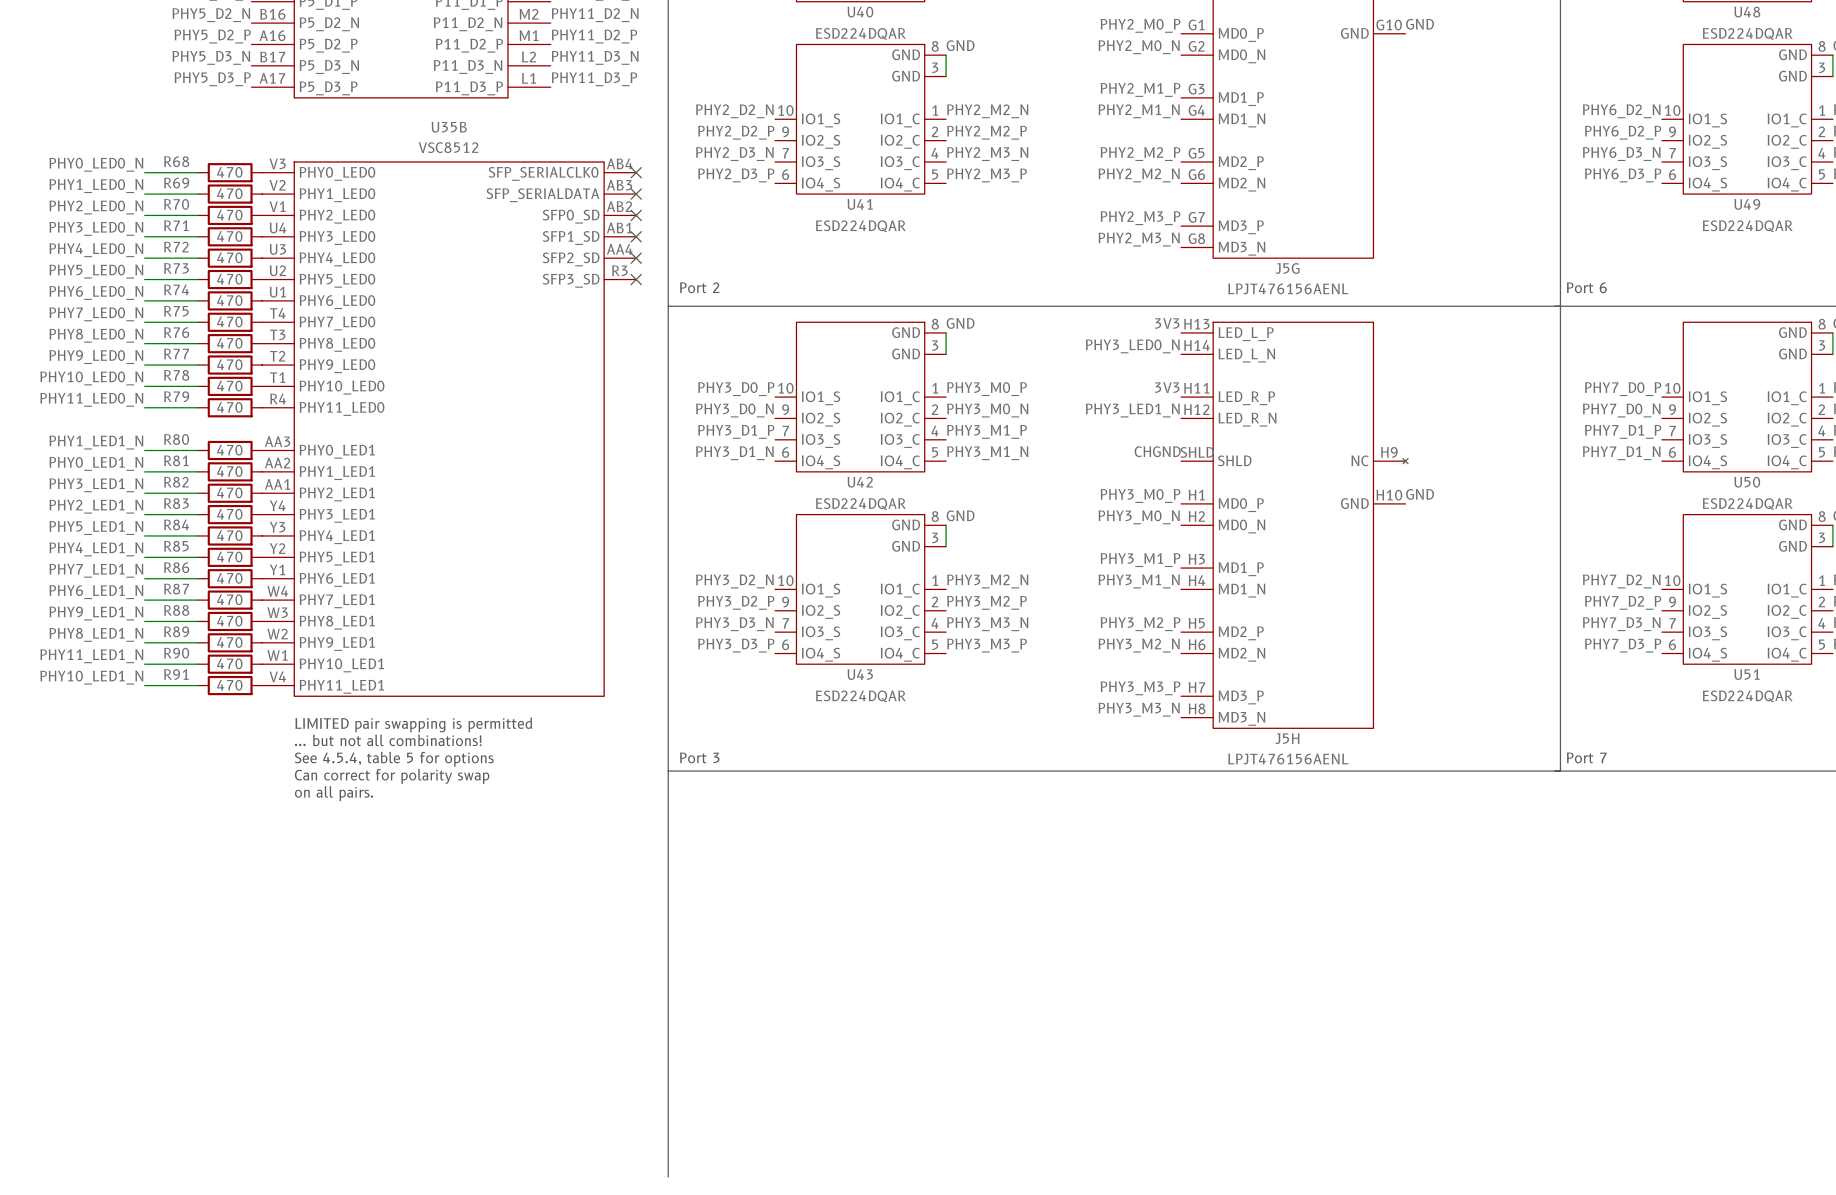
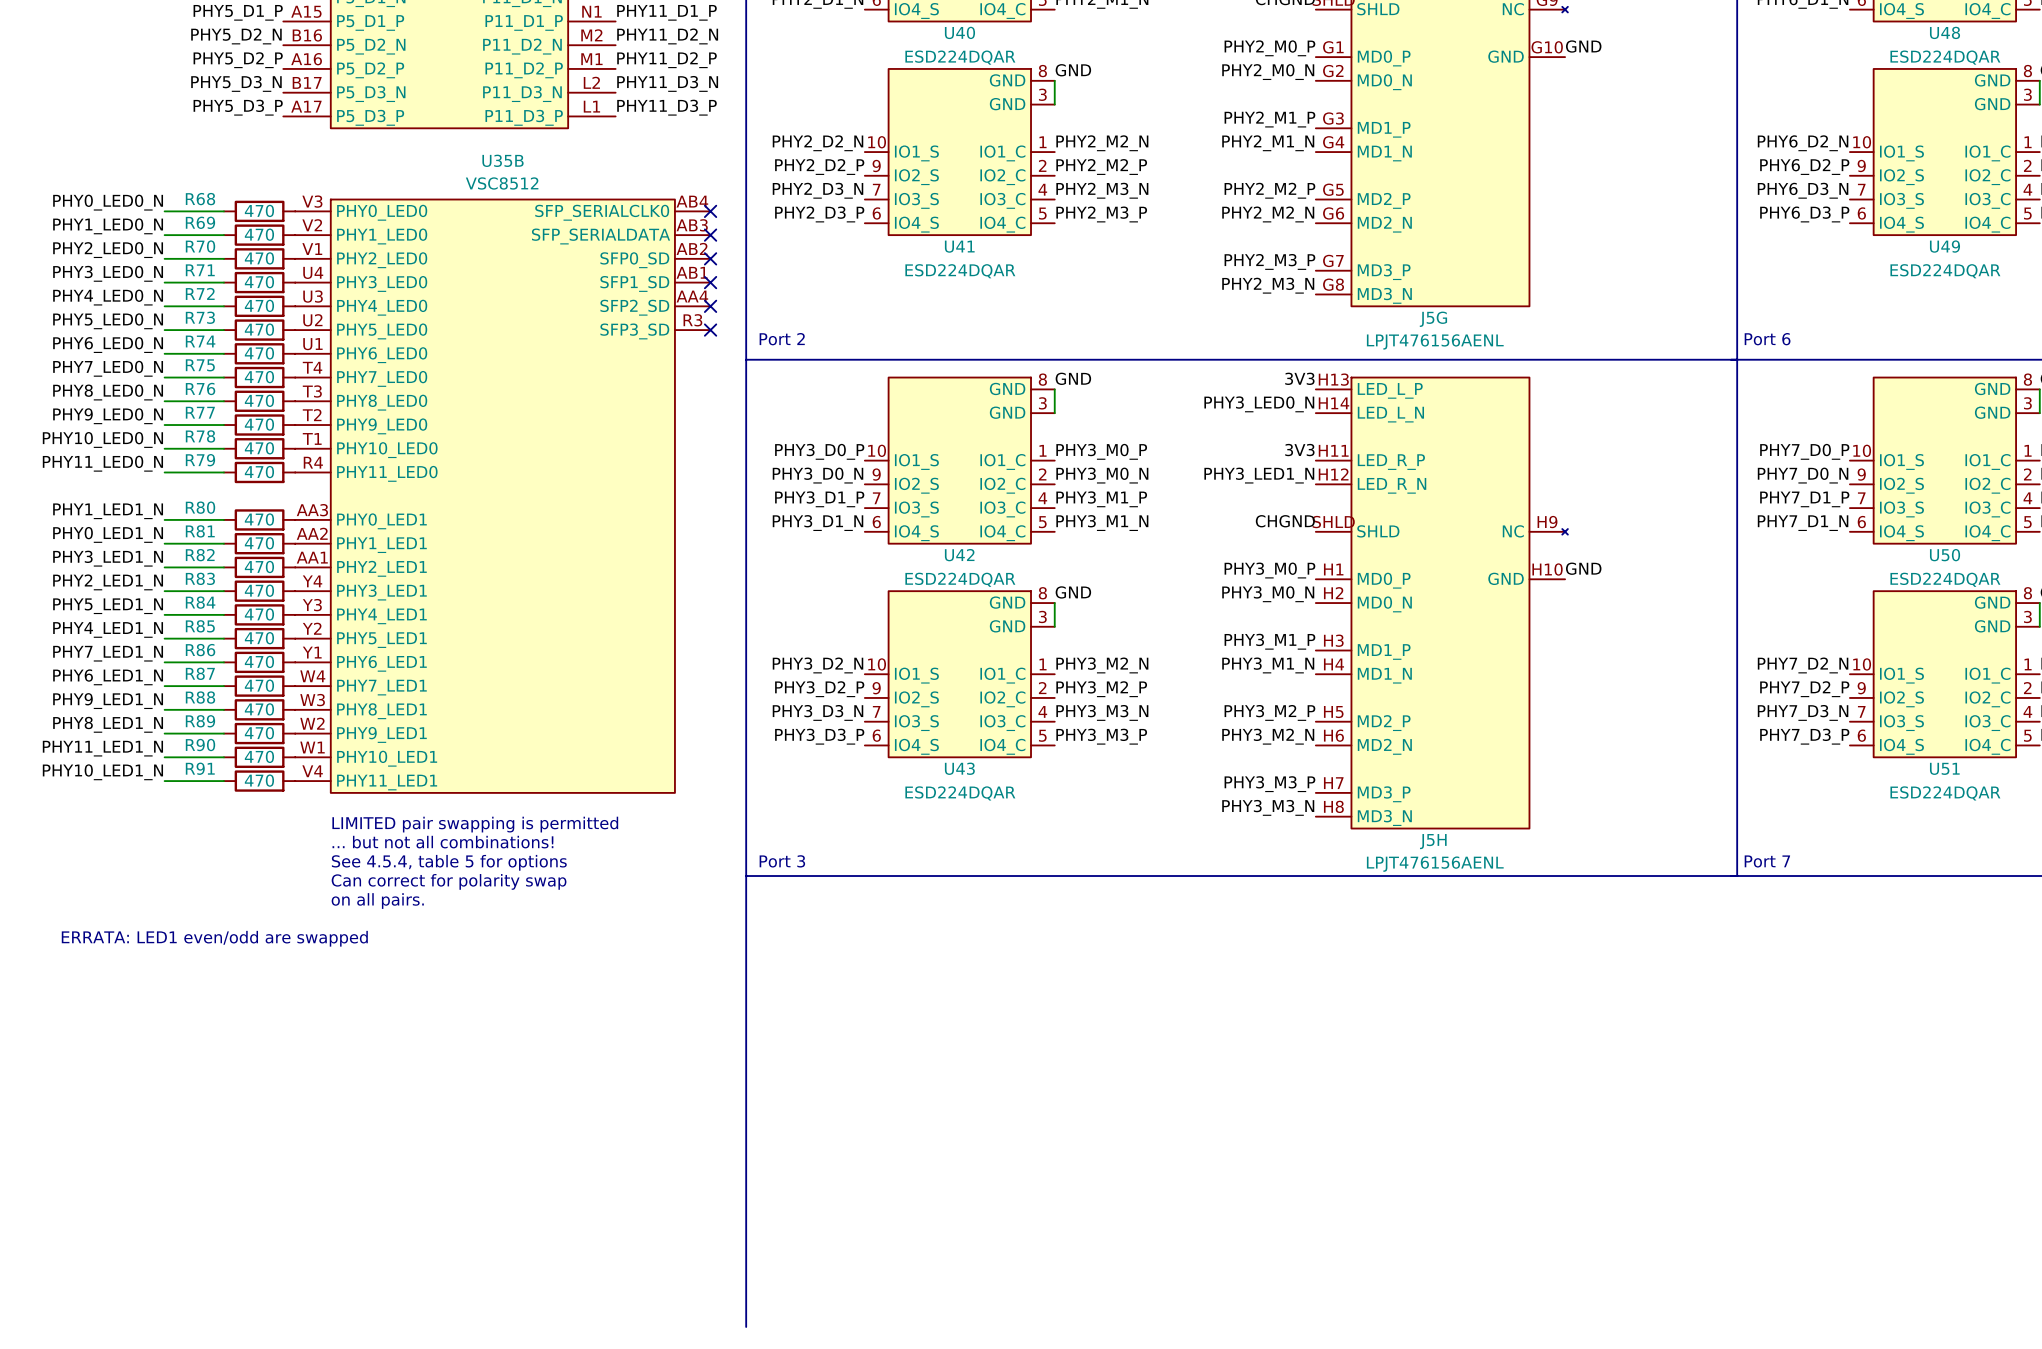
text: none -> ERRATA: LED1 even/odd are swapped (214, 938)

